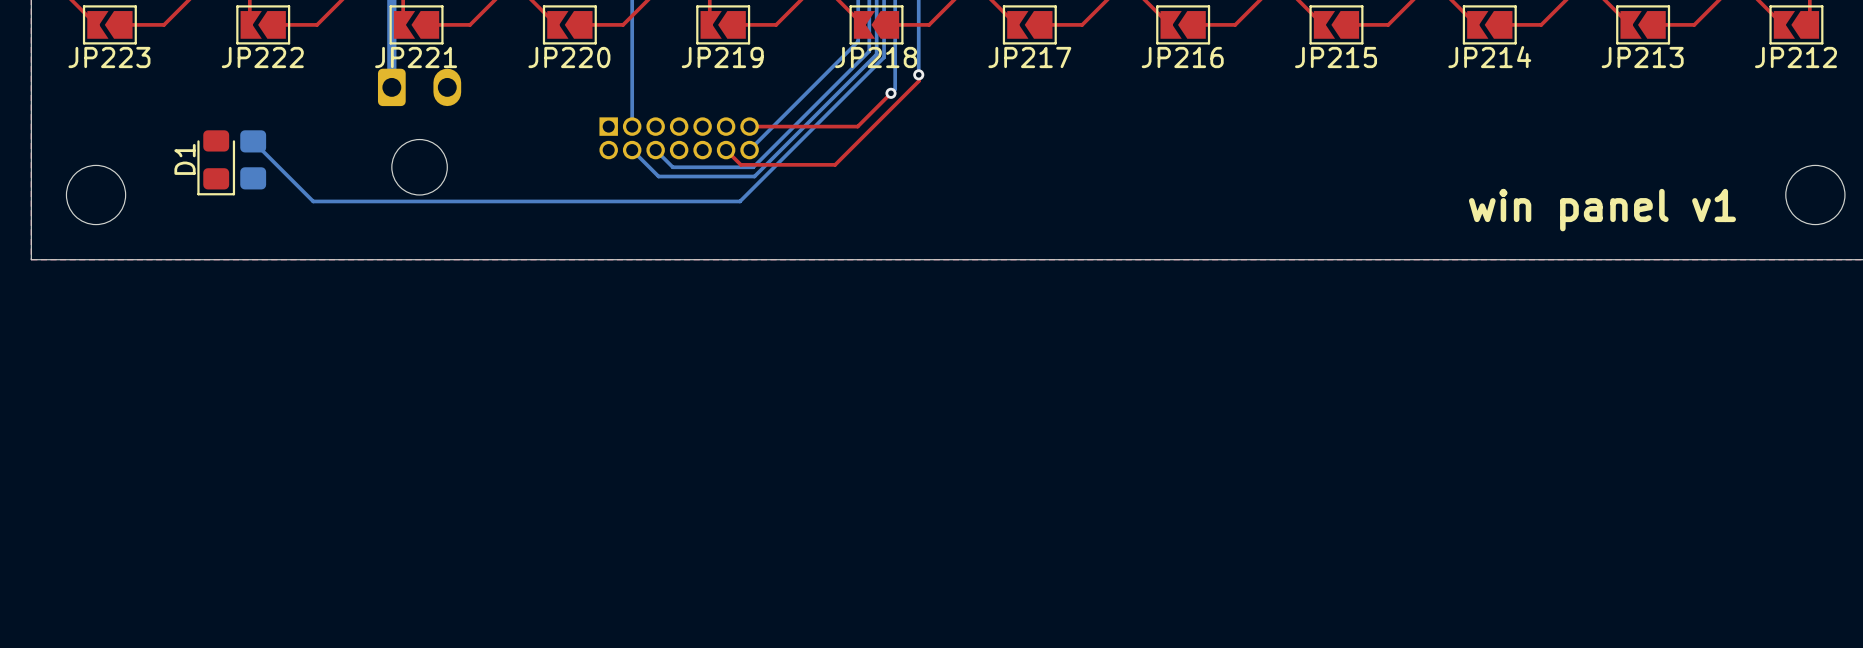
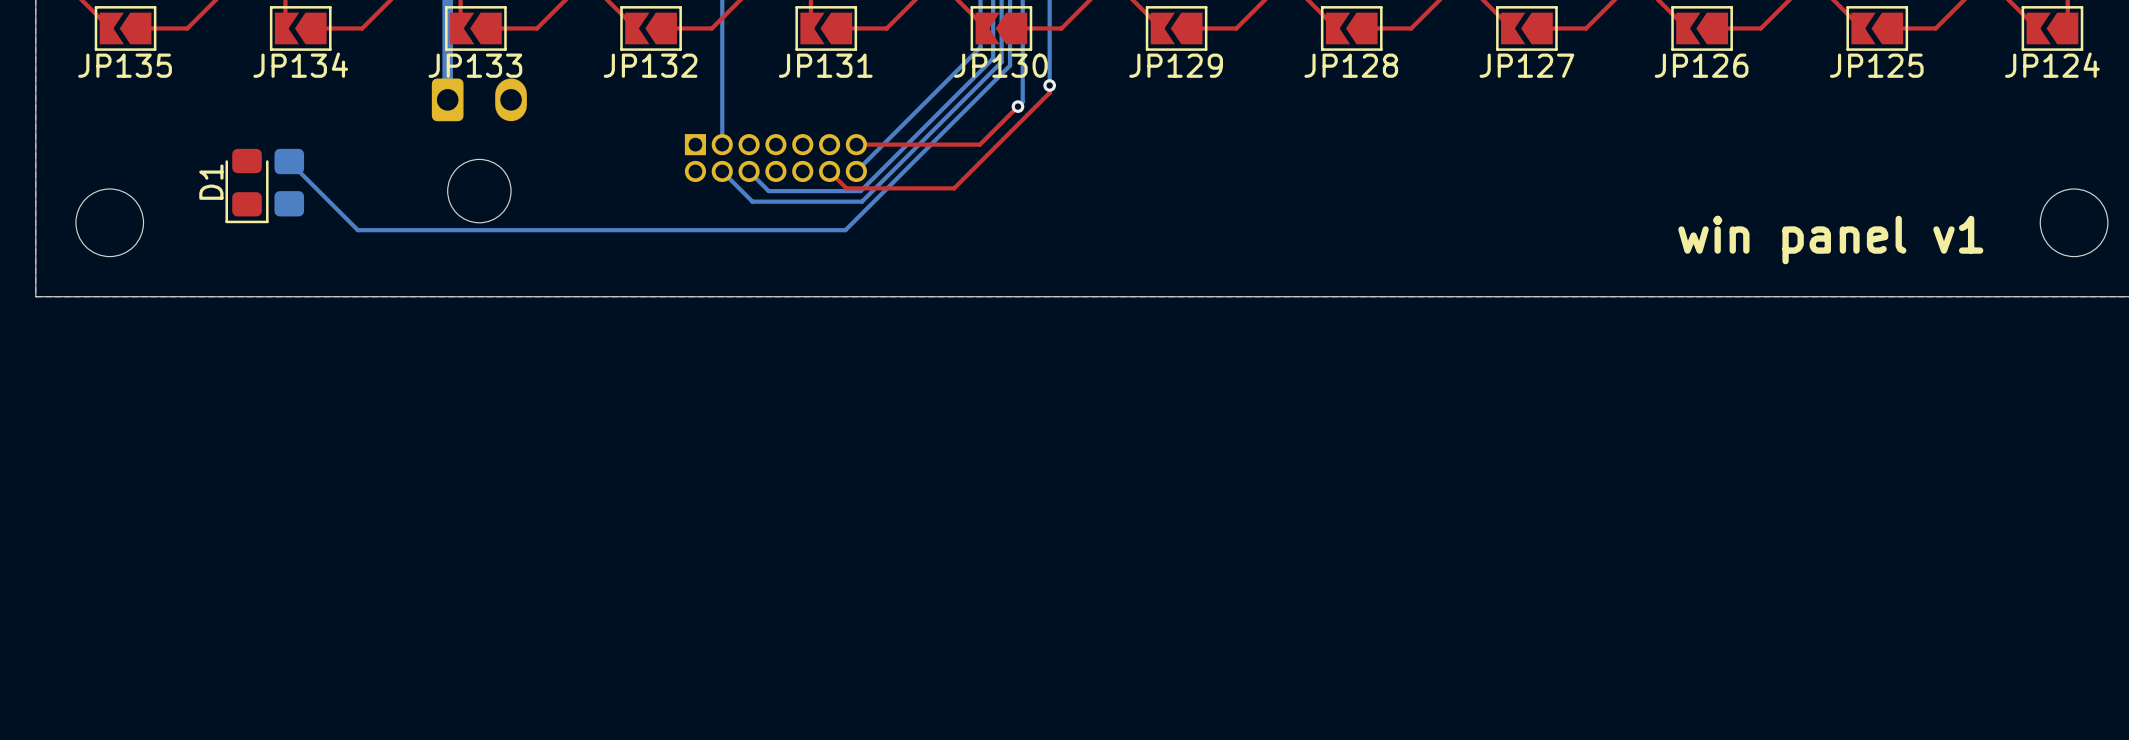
JP223 name: JP223 (109, 57) -> JP135 (125, 65)
JP222 name: JP222 (262, 57) -> JP134 (300, 65)
JP221 name: JP221 (416, 57) -> JP133 (475, 65)
JP220 name: JP220 (569, 57) -> JP132 (650, 65)
JP219 name: JP219 (722, 57) -> JP131 (825, 65)
JP218 name: JP218 (876, 57) -> JP130 (1000, 65)
JP217 name: JP217 (1029, 57) -> JP129 (1176, 65)
JP216 name: JP216 (1182, 57) -> JP128 (1351, 65)
JP215 name: JP215 (1336, 57) -> JP127 (1526, 65)
JP214 name: JP214 (1489, 57) -> JP126 (1701, 65)
JP213 name: JP213 (1642, 57) -> JP125 (1876, 65)
JP212 name: JP212 (1795, 57) -> JP124 (2052, 65)

